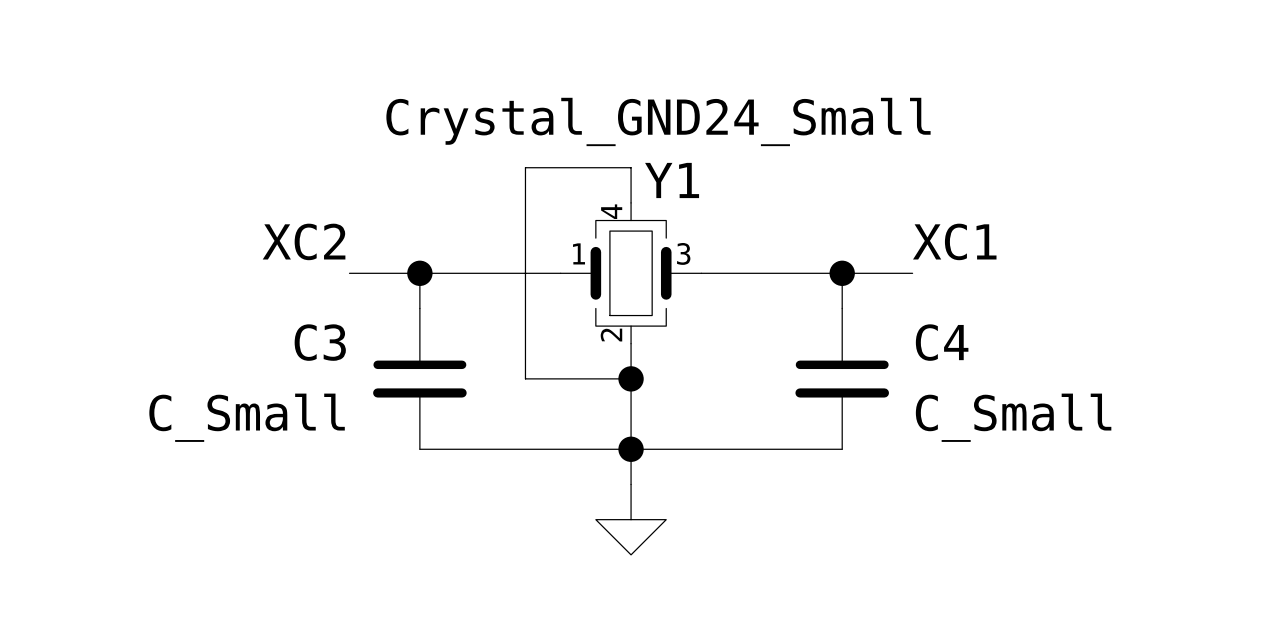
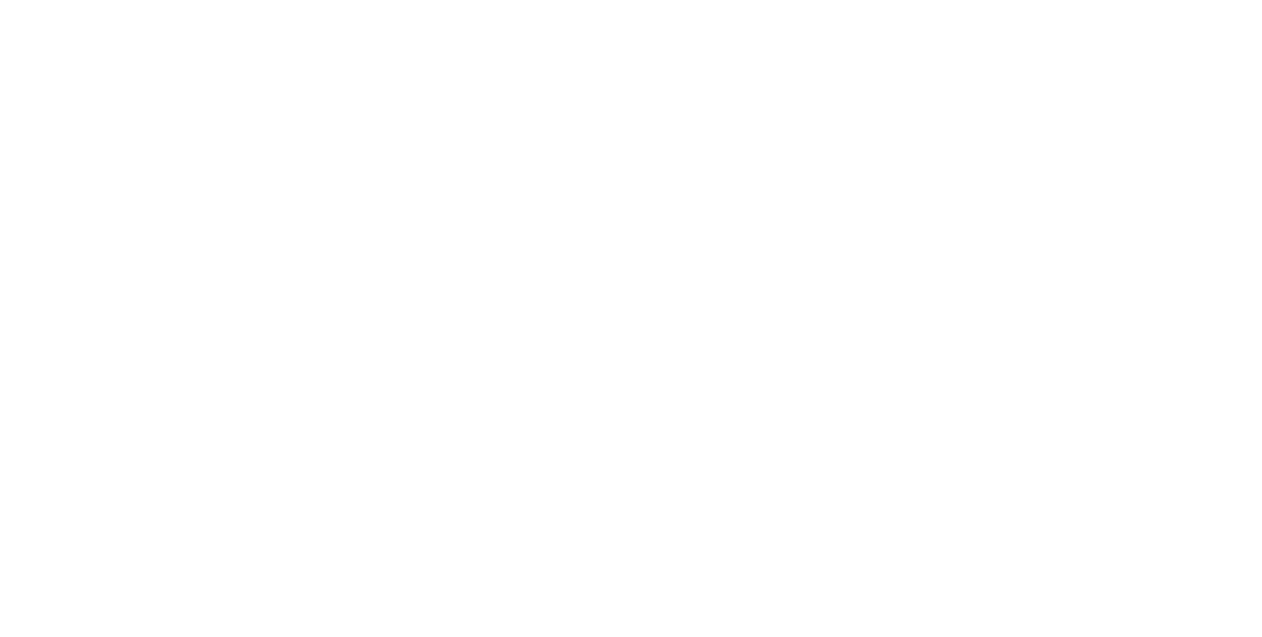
wire: (631, 202) (631, 167) (525, 167) (525, 378) (631, 378) -> none
label: XC2 (304, 241) -> none
label: XC1 (954, 241) -> none
wire: (349, 273) (560, 273) -> none
wire: (419, 273) (419, 308) -> none
junction: (419, 273) -> none
Y1: Crystal_GND24_Small (631, 273) -> none
wire: (701, 273) (912, 273) -> none
wire: (842, 273) (842, 308) -> none
junction: (842, 273) -> none
wire: (631, 343) (631, 484) -> none
C3: C_Small (419, 378) -> none
junction: (631, 378) -> none
C4: C_Small (842, 378) -> none
wire: (419, 449) (842, 449) -> none
junction: (631, 449) -> none
power symbol: (631, 519) -> none

